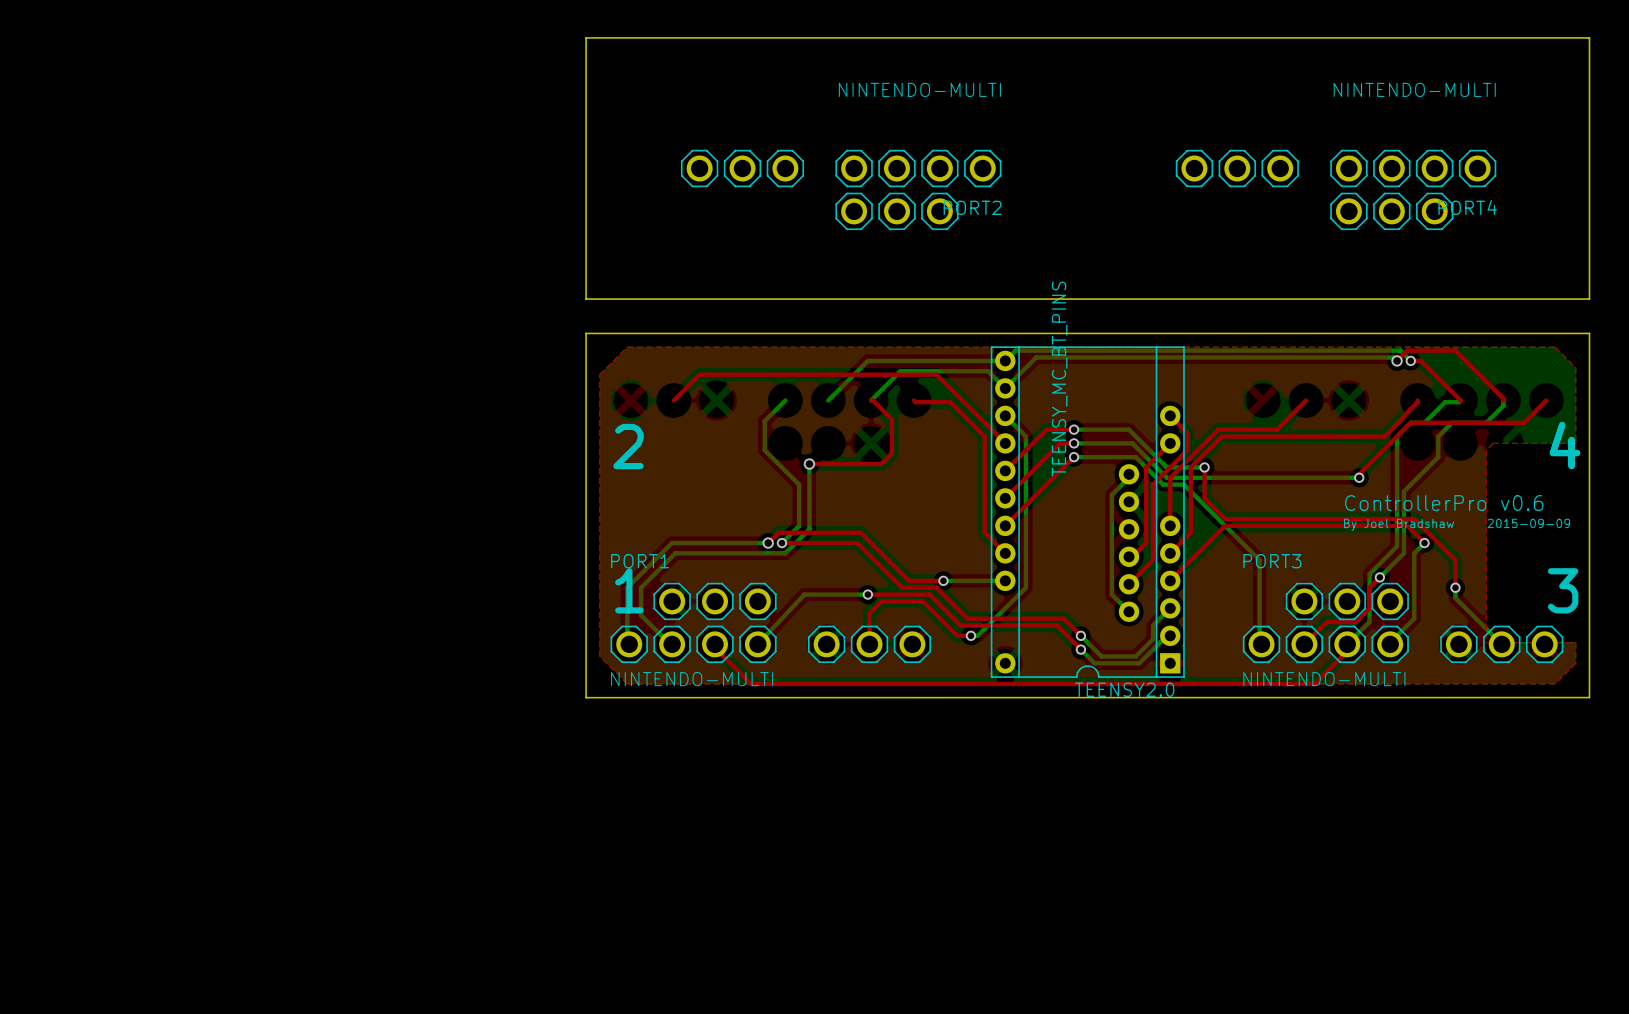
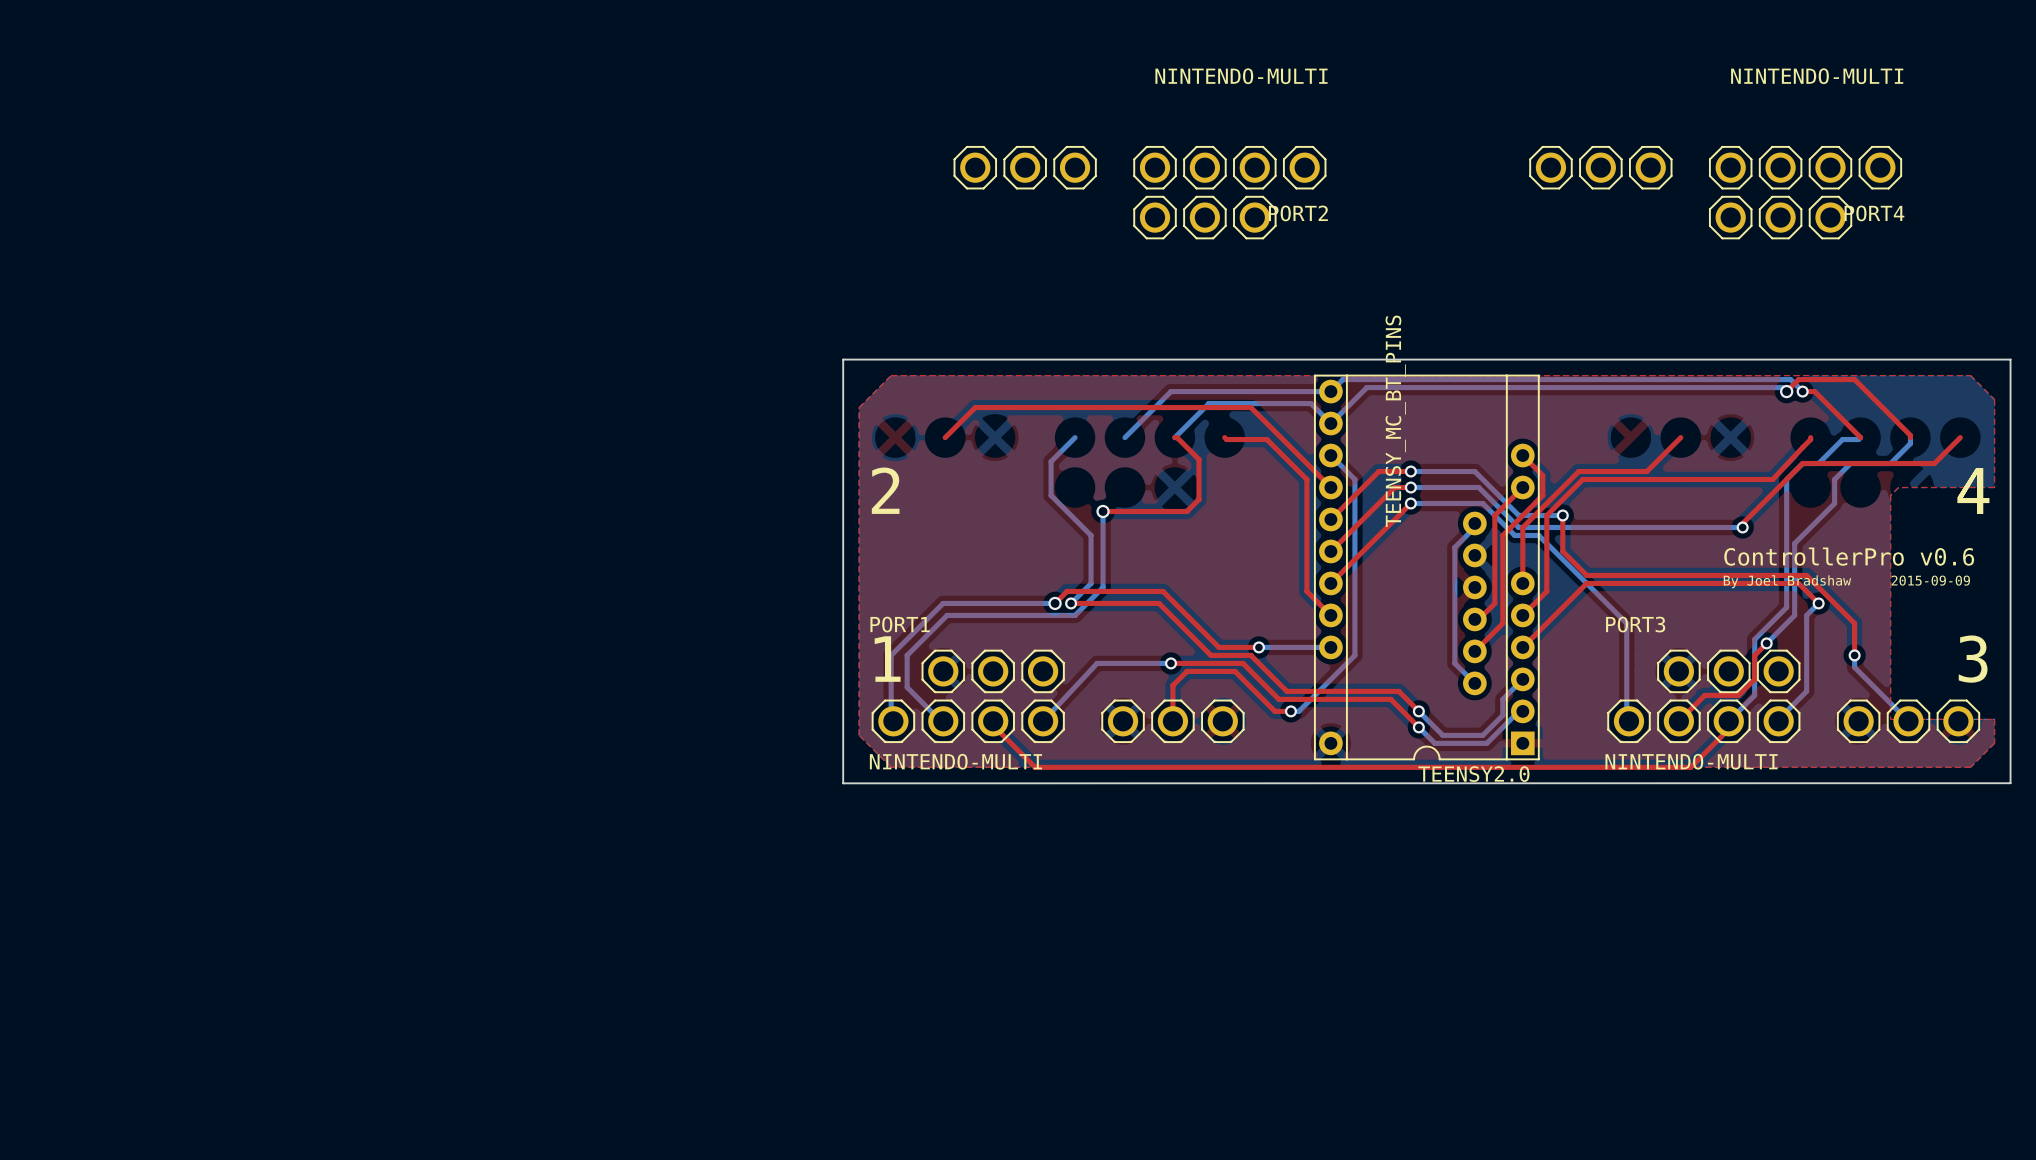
board edge: (586, 37) (1589, 37) (1589, 299) (586, 299) (586, 37) -> none

